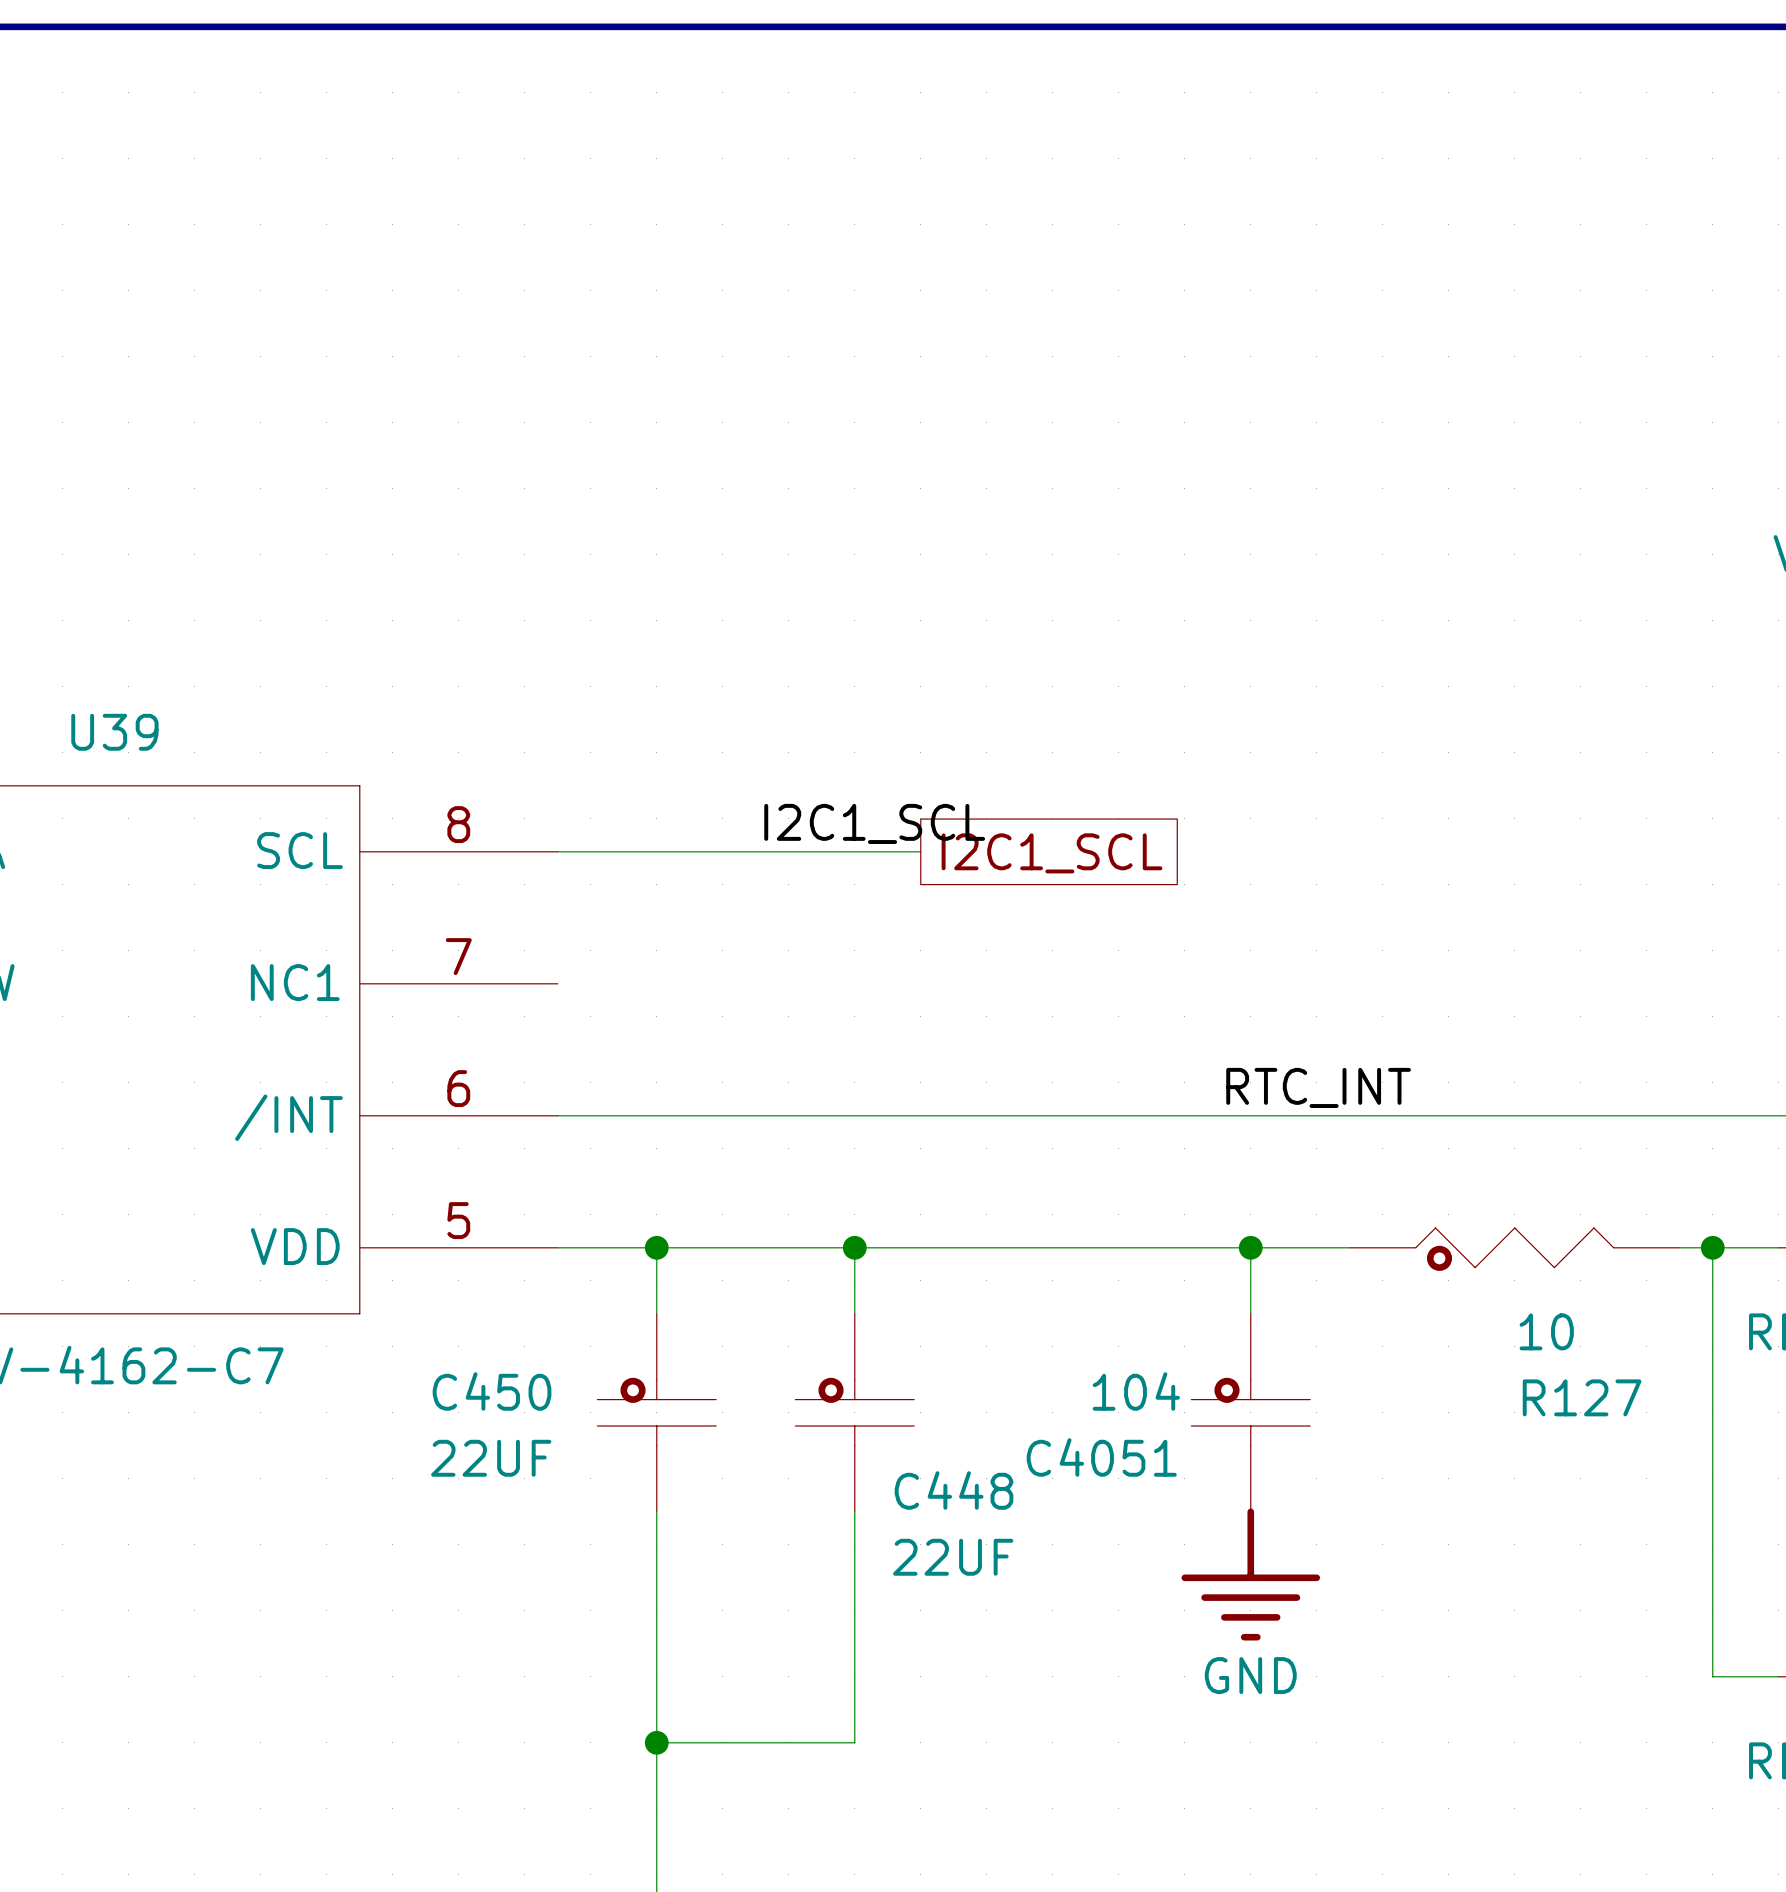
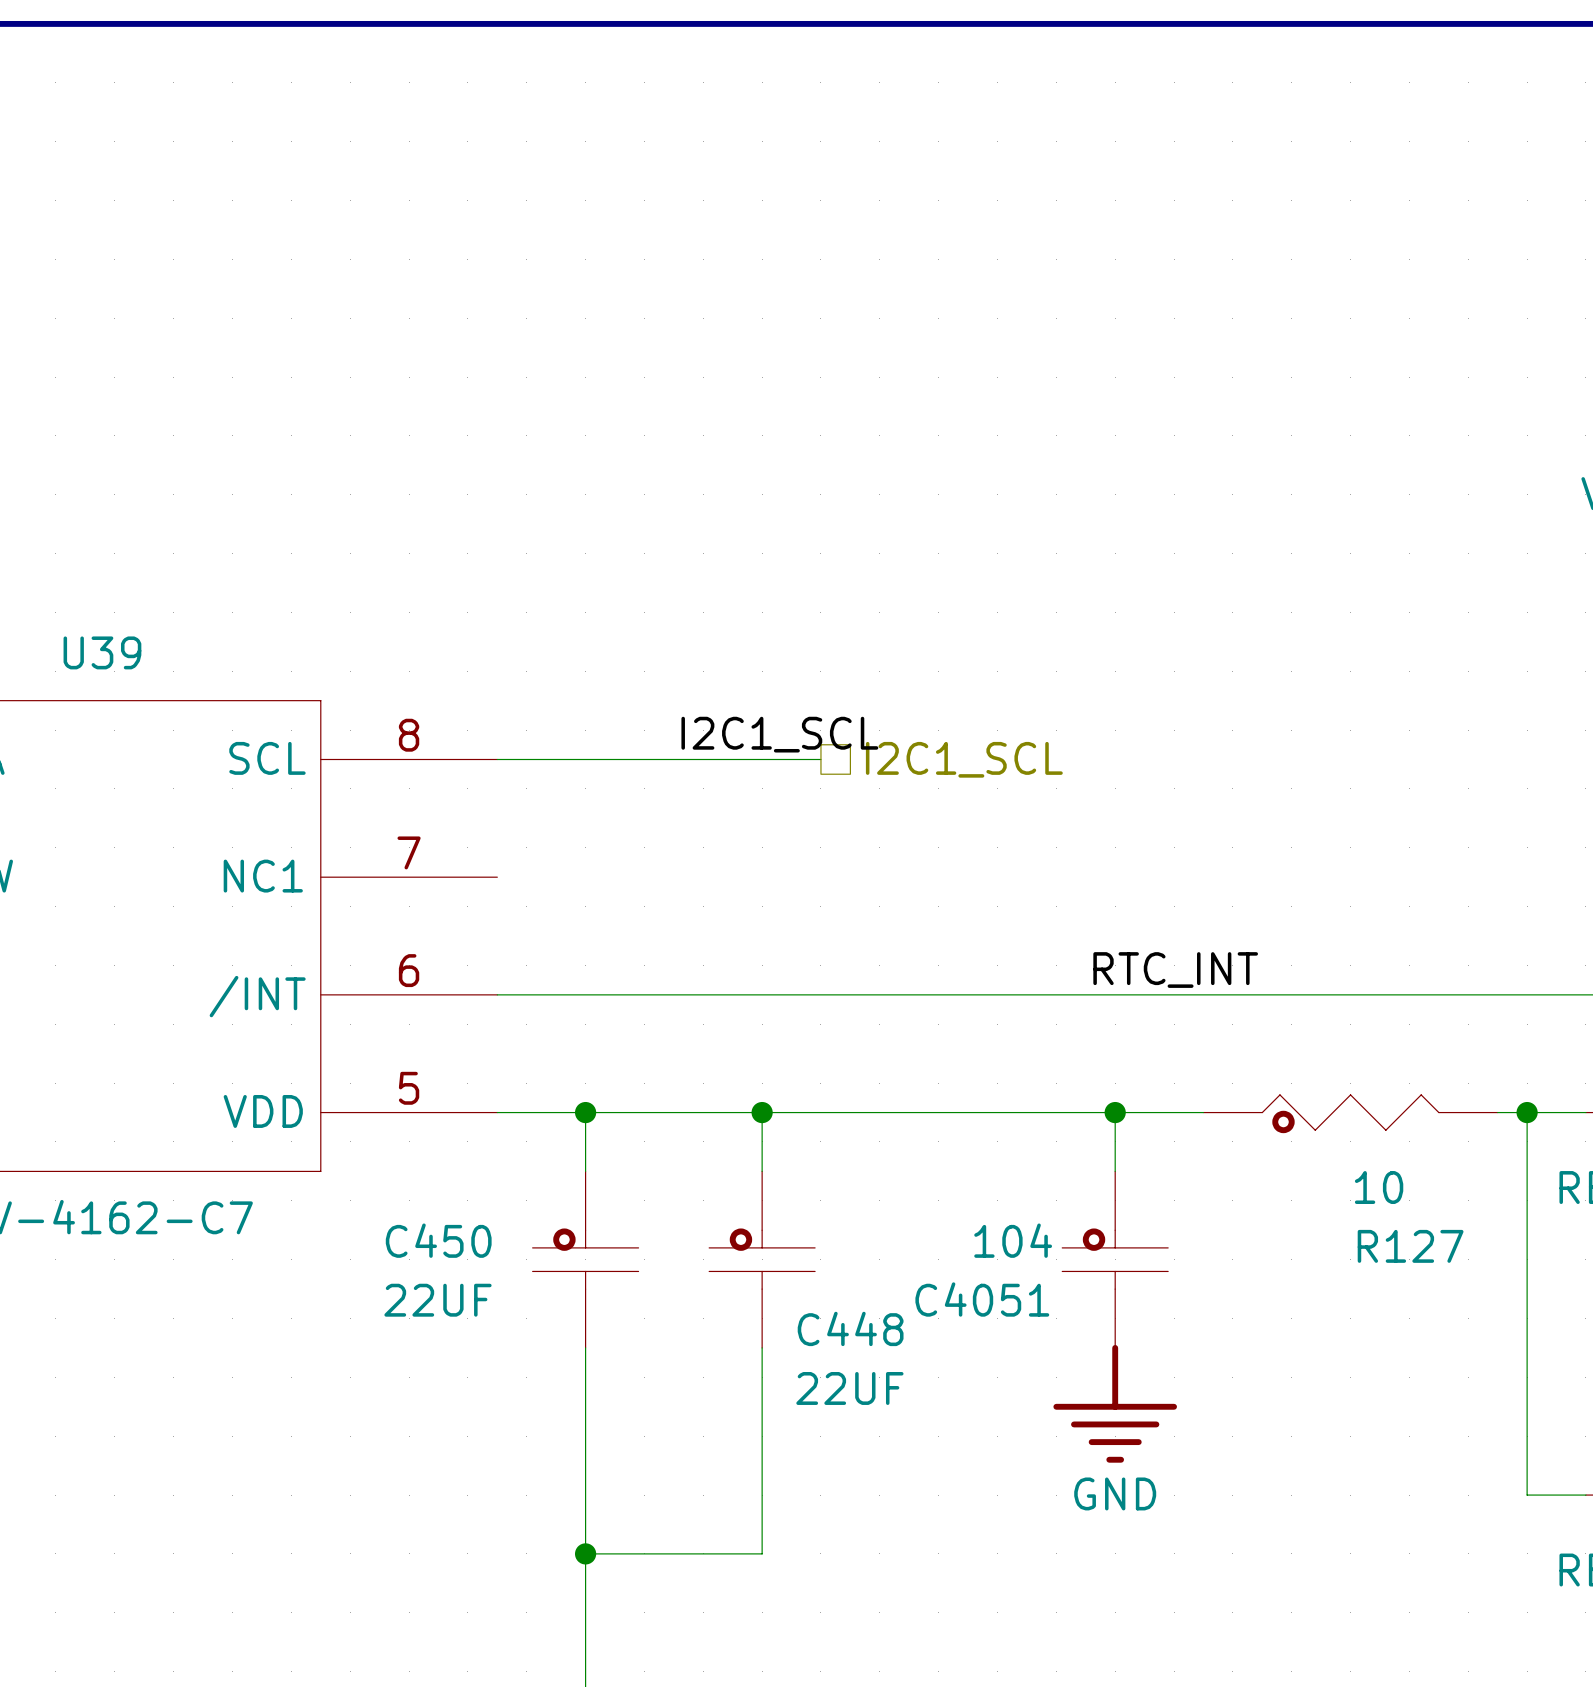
hierarchical label: none -> I2C1_SCL (964, 759)
global label: I2C1_SCL (1052, 853) -> none

